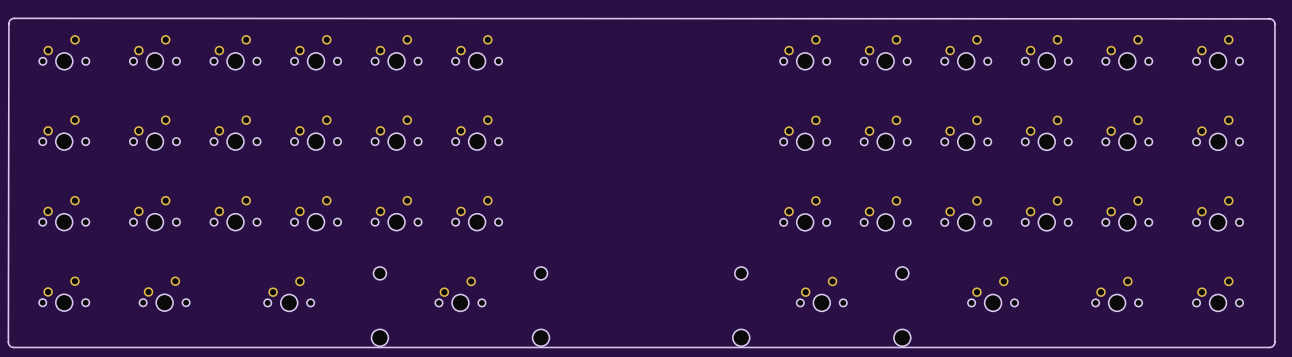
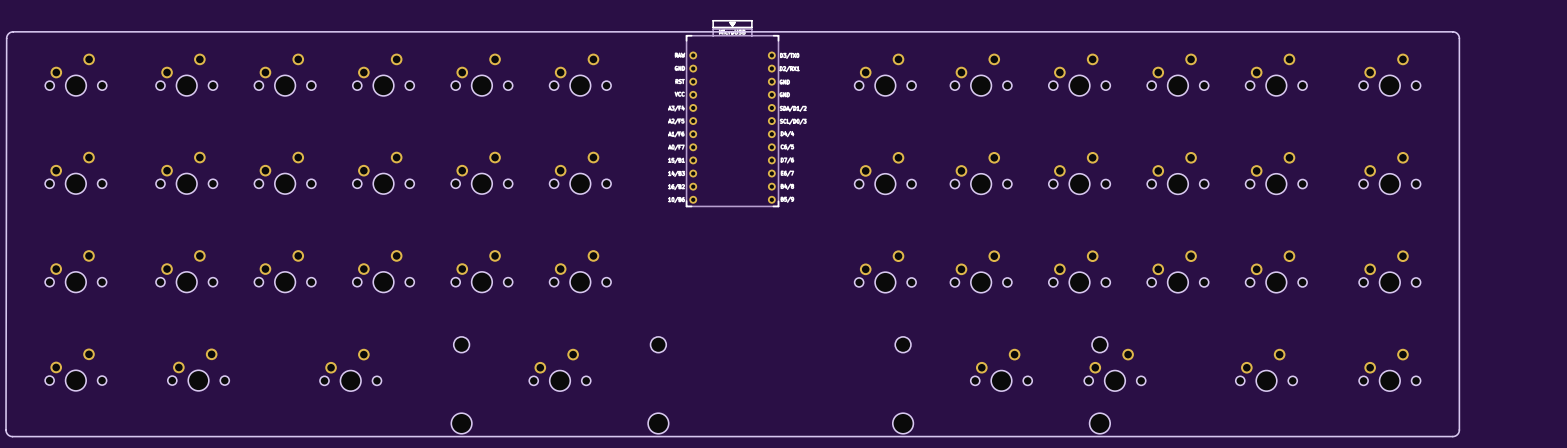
board edge: (14, 18) (1270, 19) (1274, 24) (1274, 343) (1269, 347) (12, 347) (8, 342) (8, 23) (10, 19) (14, 18) -> (13, 31) (8, 33) (6, 38) (6, 430) (11, 436) (1452, 436) (1459, 431) (1459, 38) (1454, 32) (13, 31)
part: none -> (885, 74)
part position: (1127, 52) -> (1389, 74)
part: (1218, 52) -> none
part: none -> (732, 113)
part: none -> (885, 173)
part position: (1127, 132) -> (1389, 173)
part: (1218, 132) -> none
part: none -> (885, 271)
part position: (1127, 213) -> (1389, 271)
part: (1218, 213) -> none
part: none -> (1114, 369)
part: (993, 294) -> none
part: none -> (1266, 369)
part position: (1117, 294) -> (1389, 369)
part: (1218, 294) -> none

